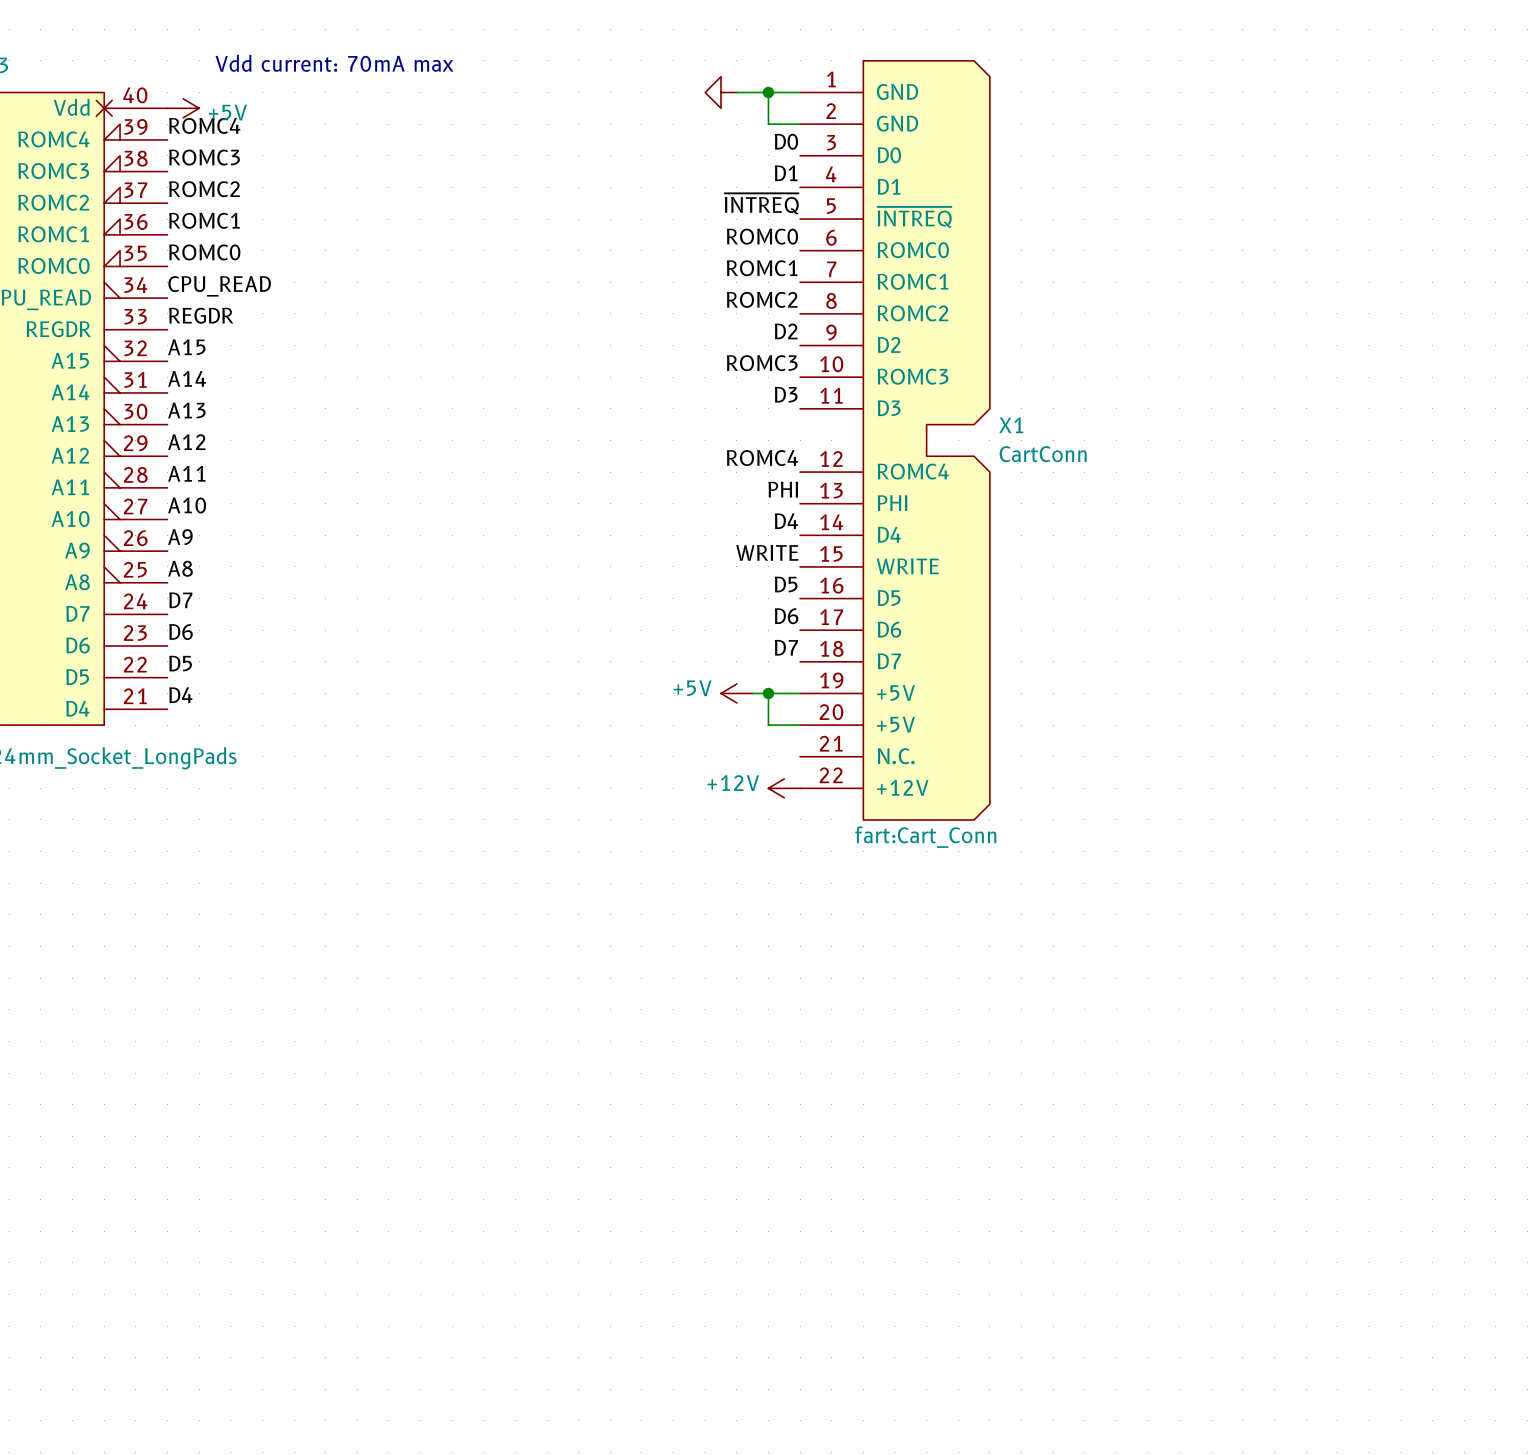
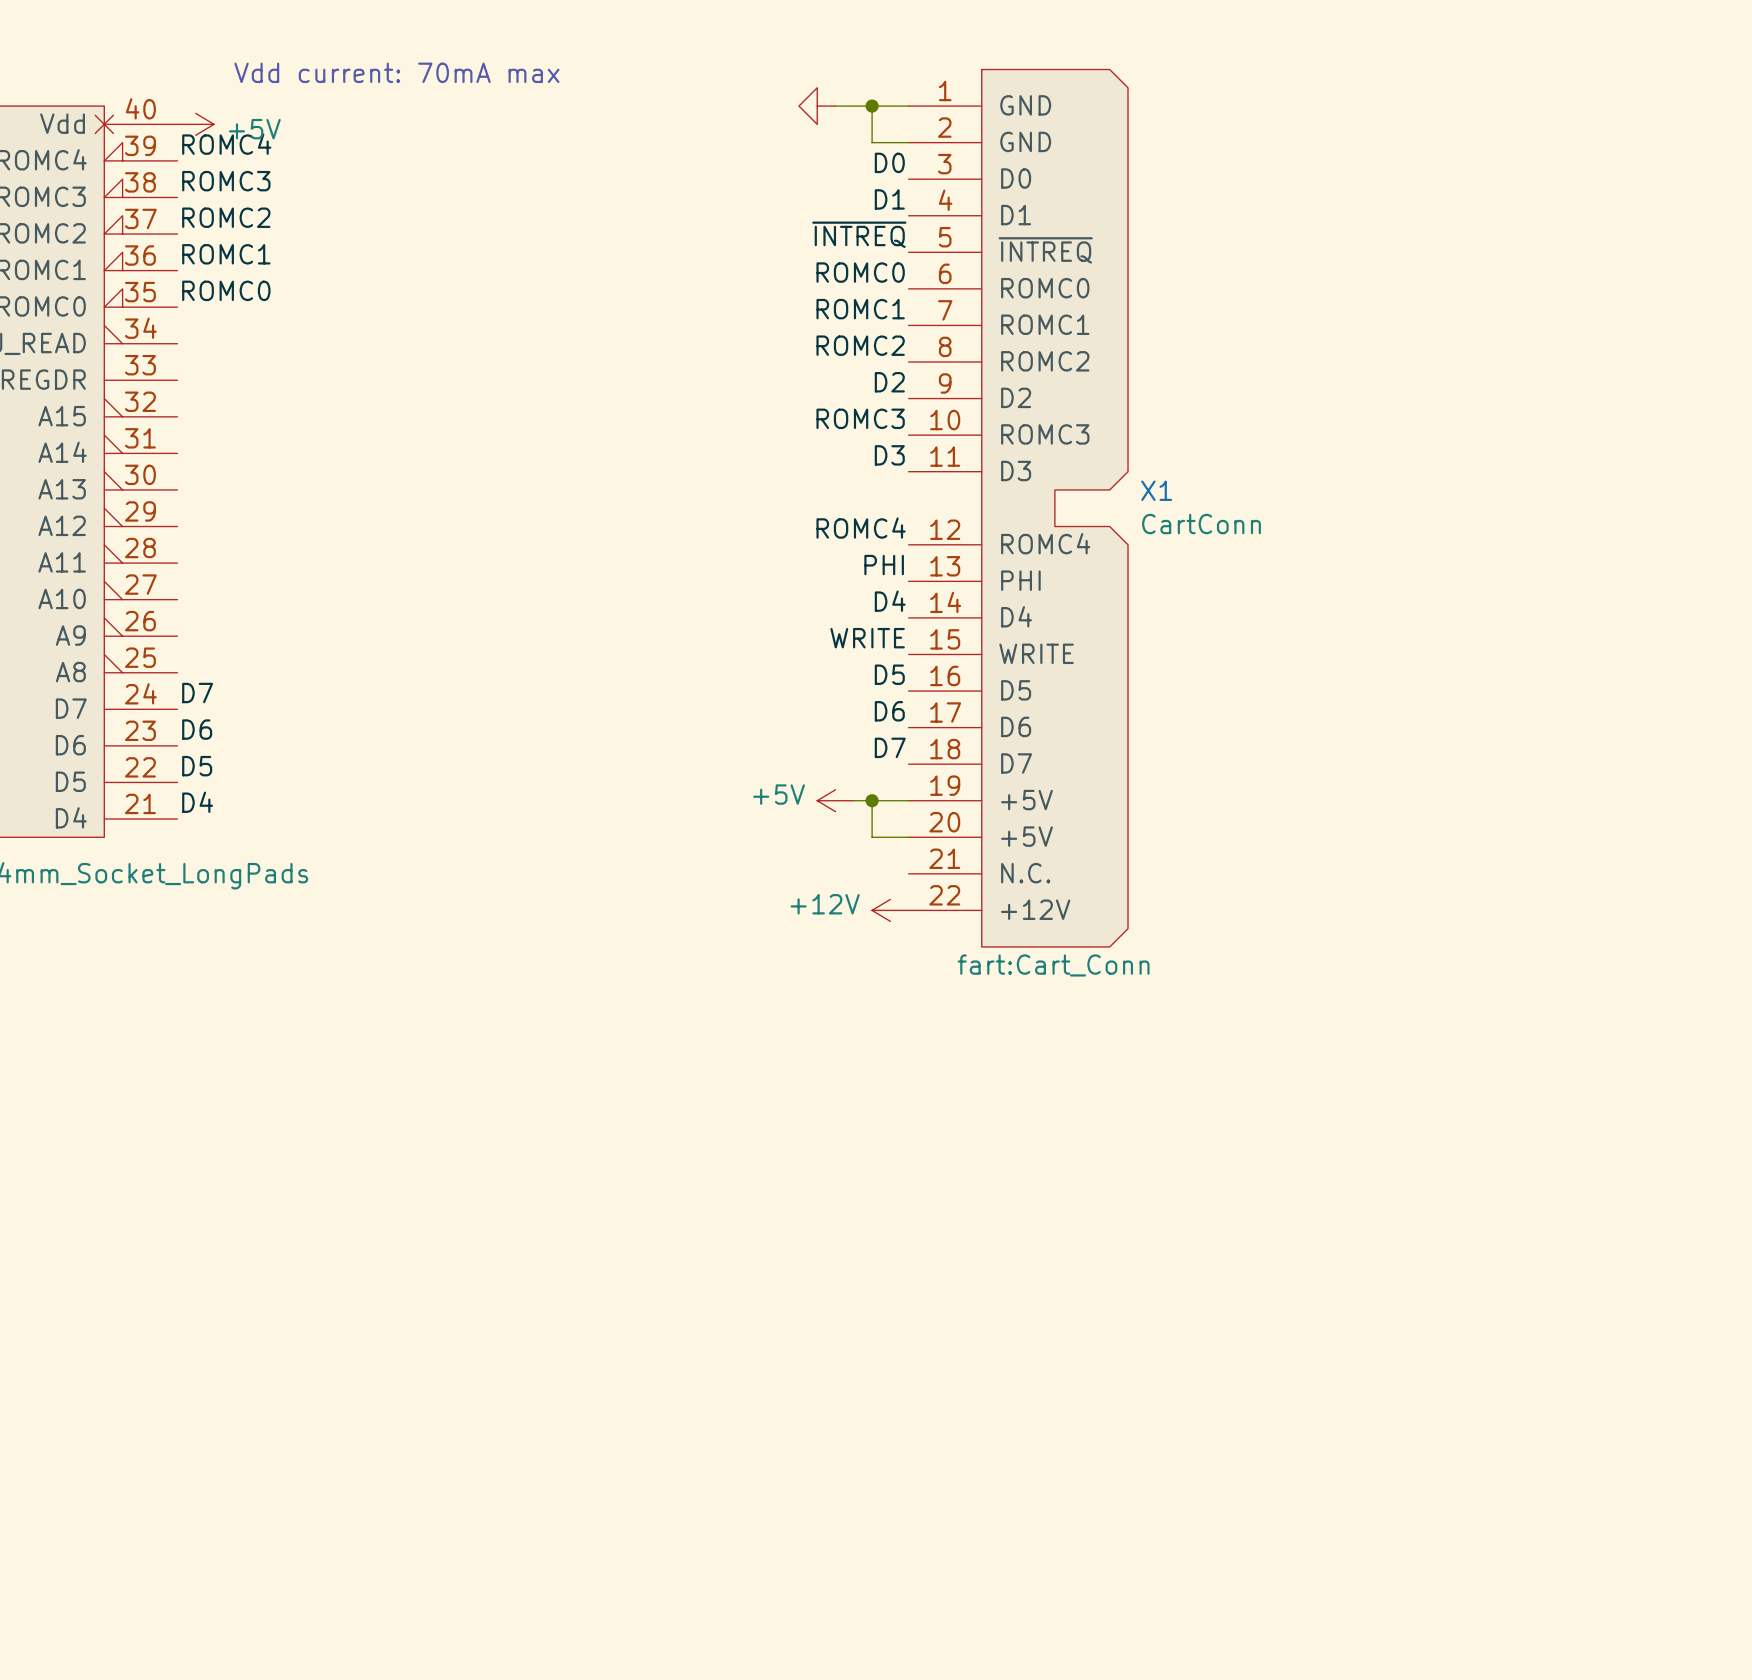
label: CPU_READ (219, 286) -> none
label: REGDR (201, 315) -> none
label: A15 (186, 347) -> none
label: A14 (187, 378) -> none
label: A13 (186, 410) -> none
label: A12 (186, 442) -> none
label: A11 (186, 473) -> none
label: A10 (187, 505) -> none
label: A9 (180, 537) -> none
label: A8 (180, 568) -> none

